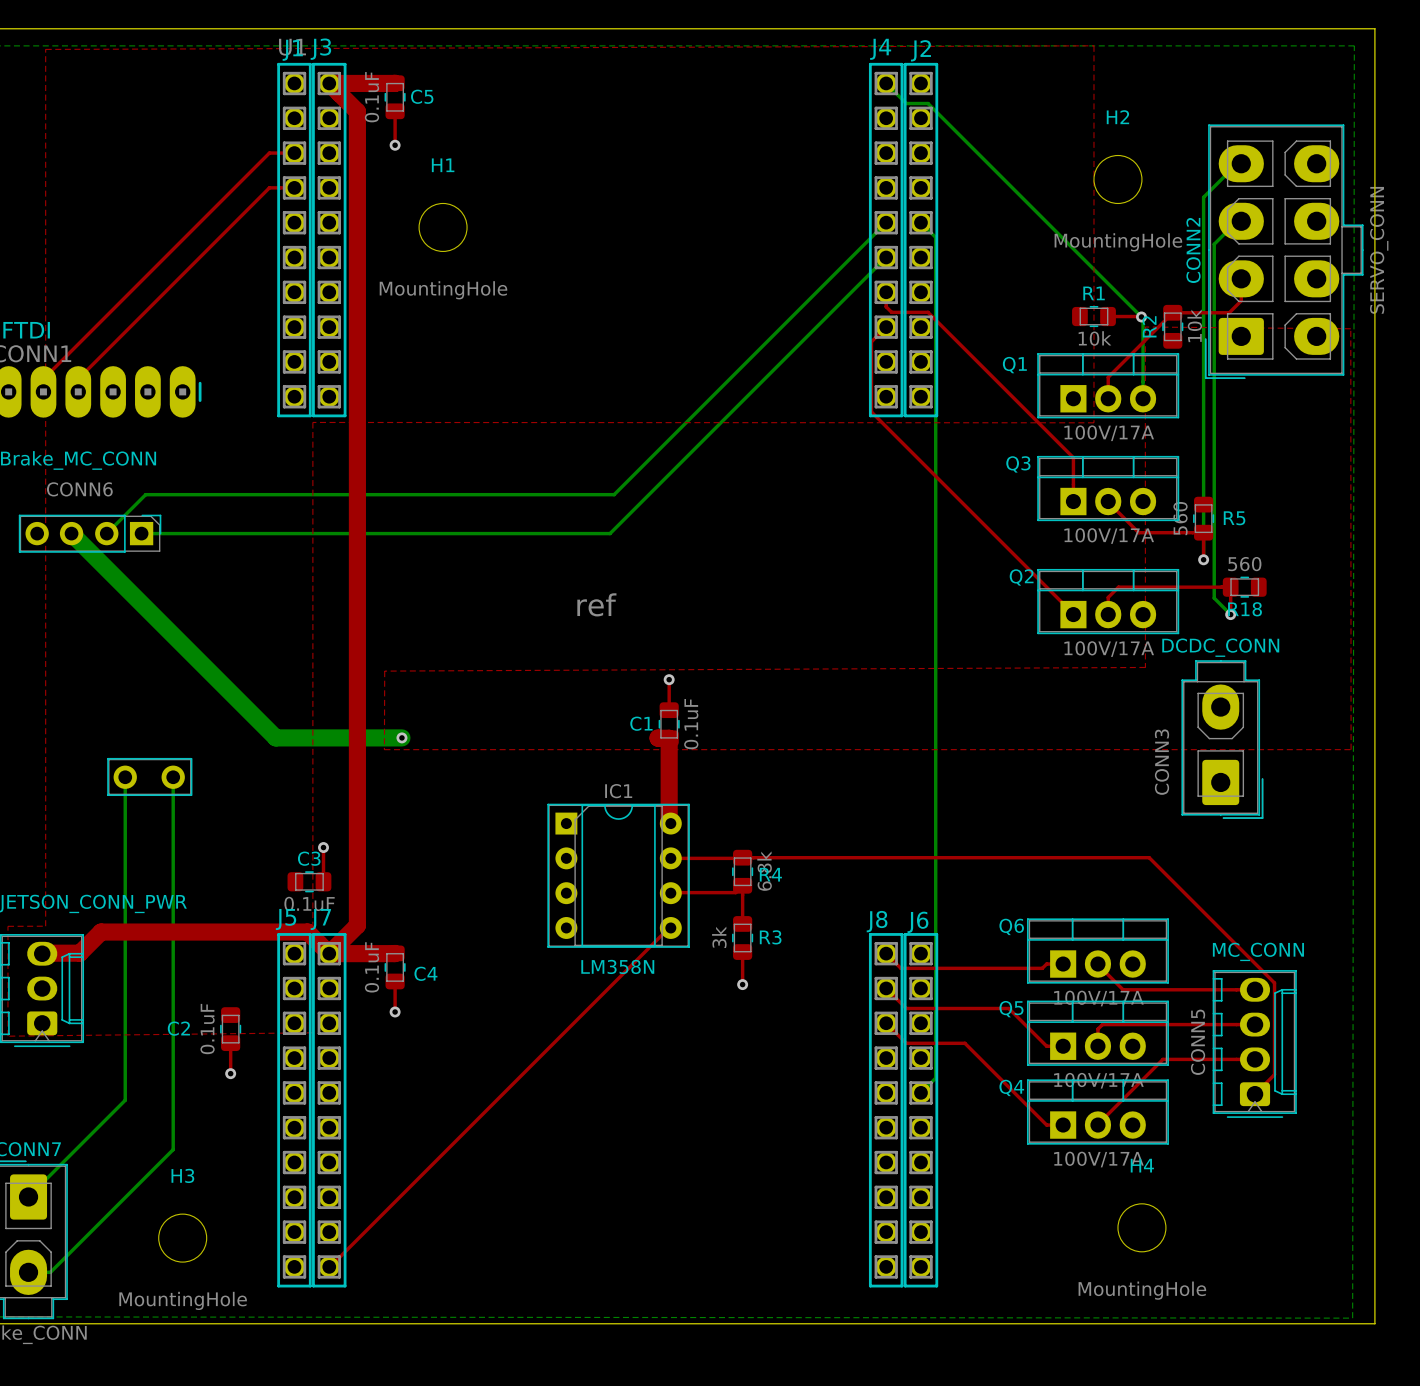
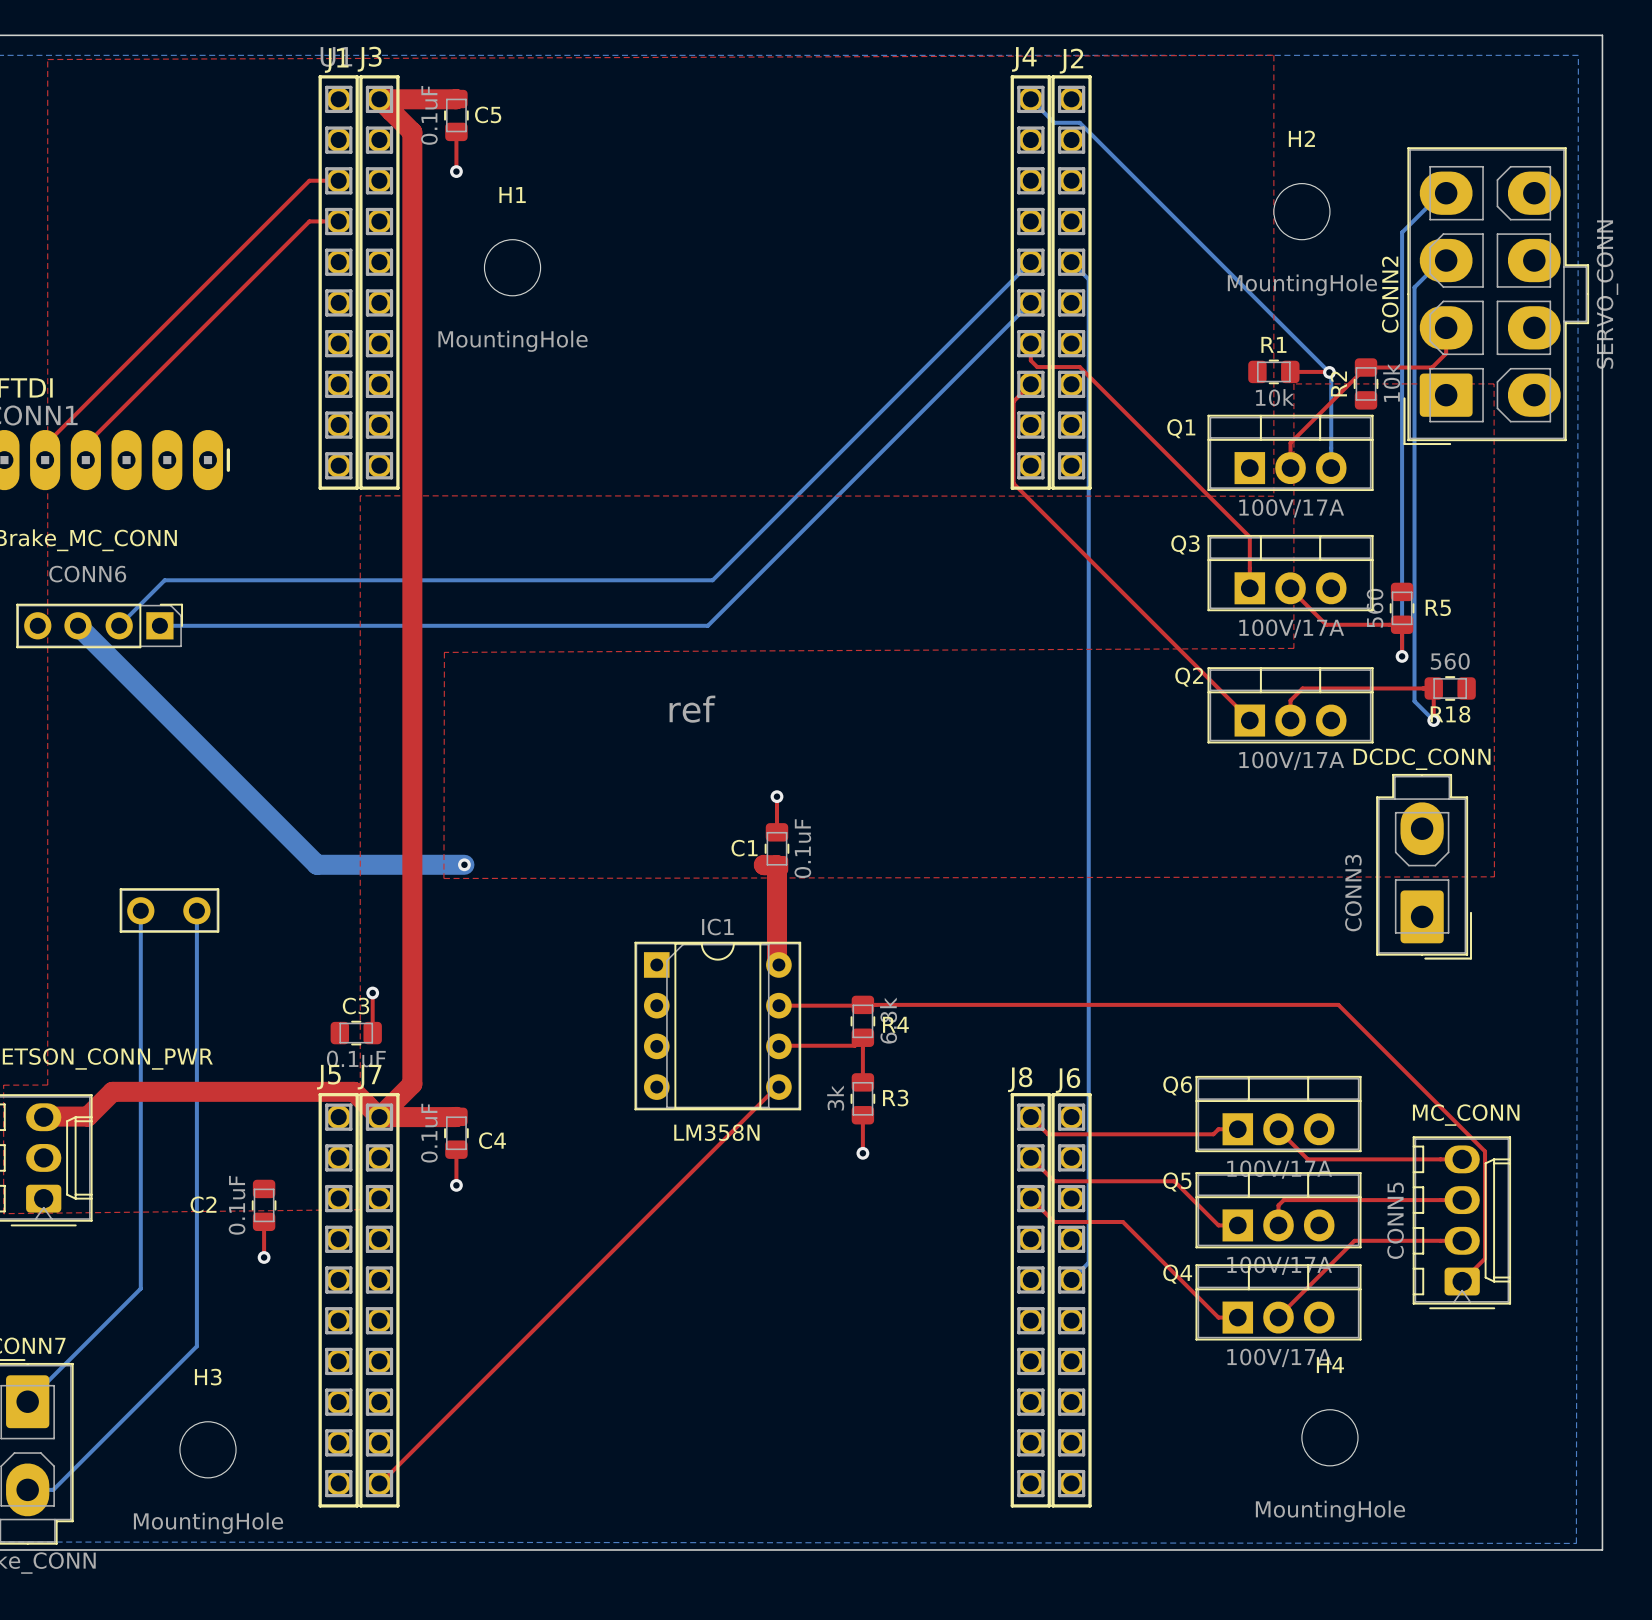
top zone outline: (1145, 327) (1145, 667) (384, 671) (384, 749) (1351, 749) (1350, 328) (1145, 327) -> (1293, 383) (1293, 648) (444, 652) (443, 878) (1494, 876) (1494, 383) (1293, 383)

